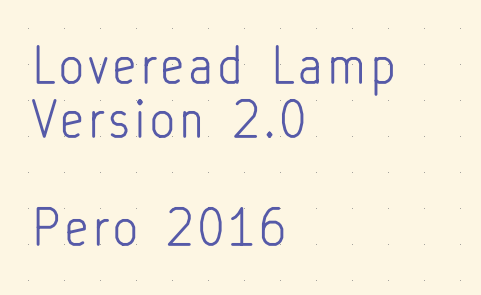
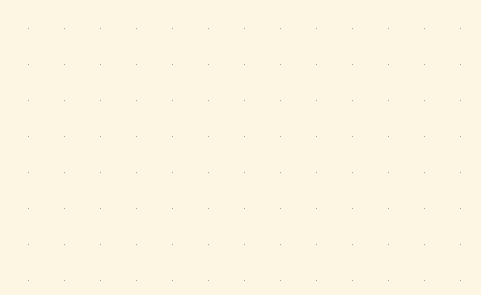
text: Loveread Lamp (214, 70) -> none
text: Version 2.0 (167, 118) -> none
text: Pero 2016 (159, 226) -> none

